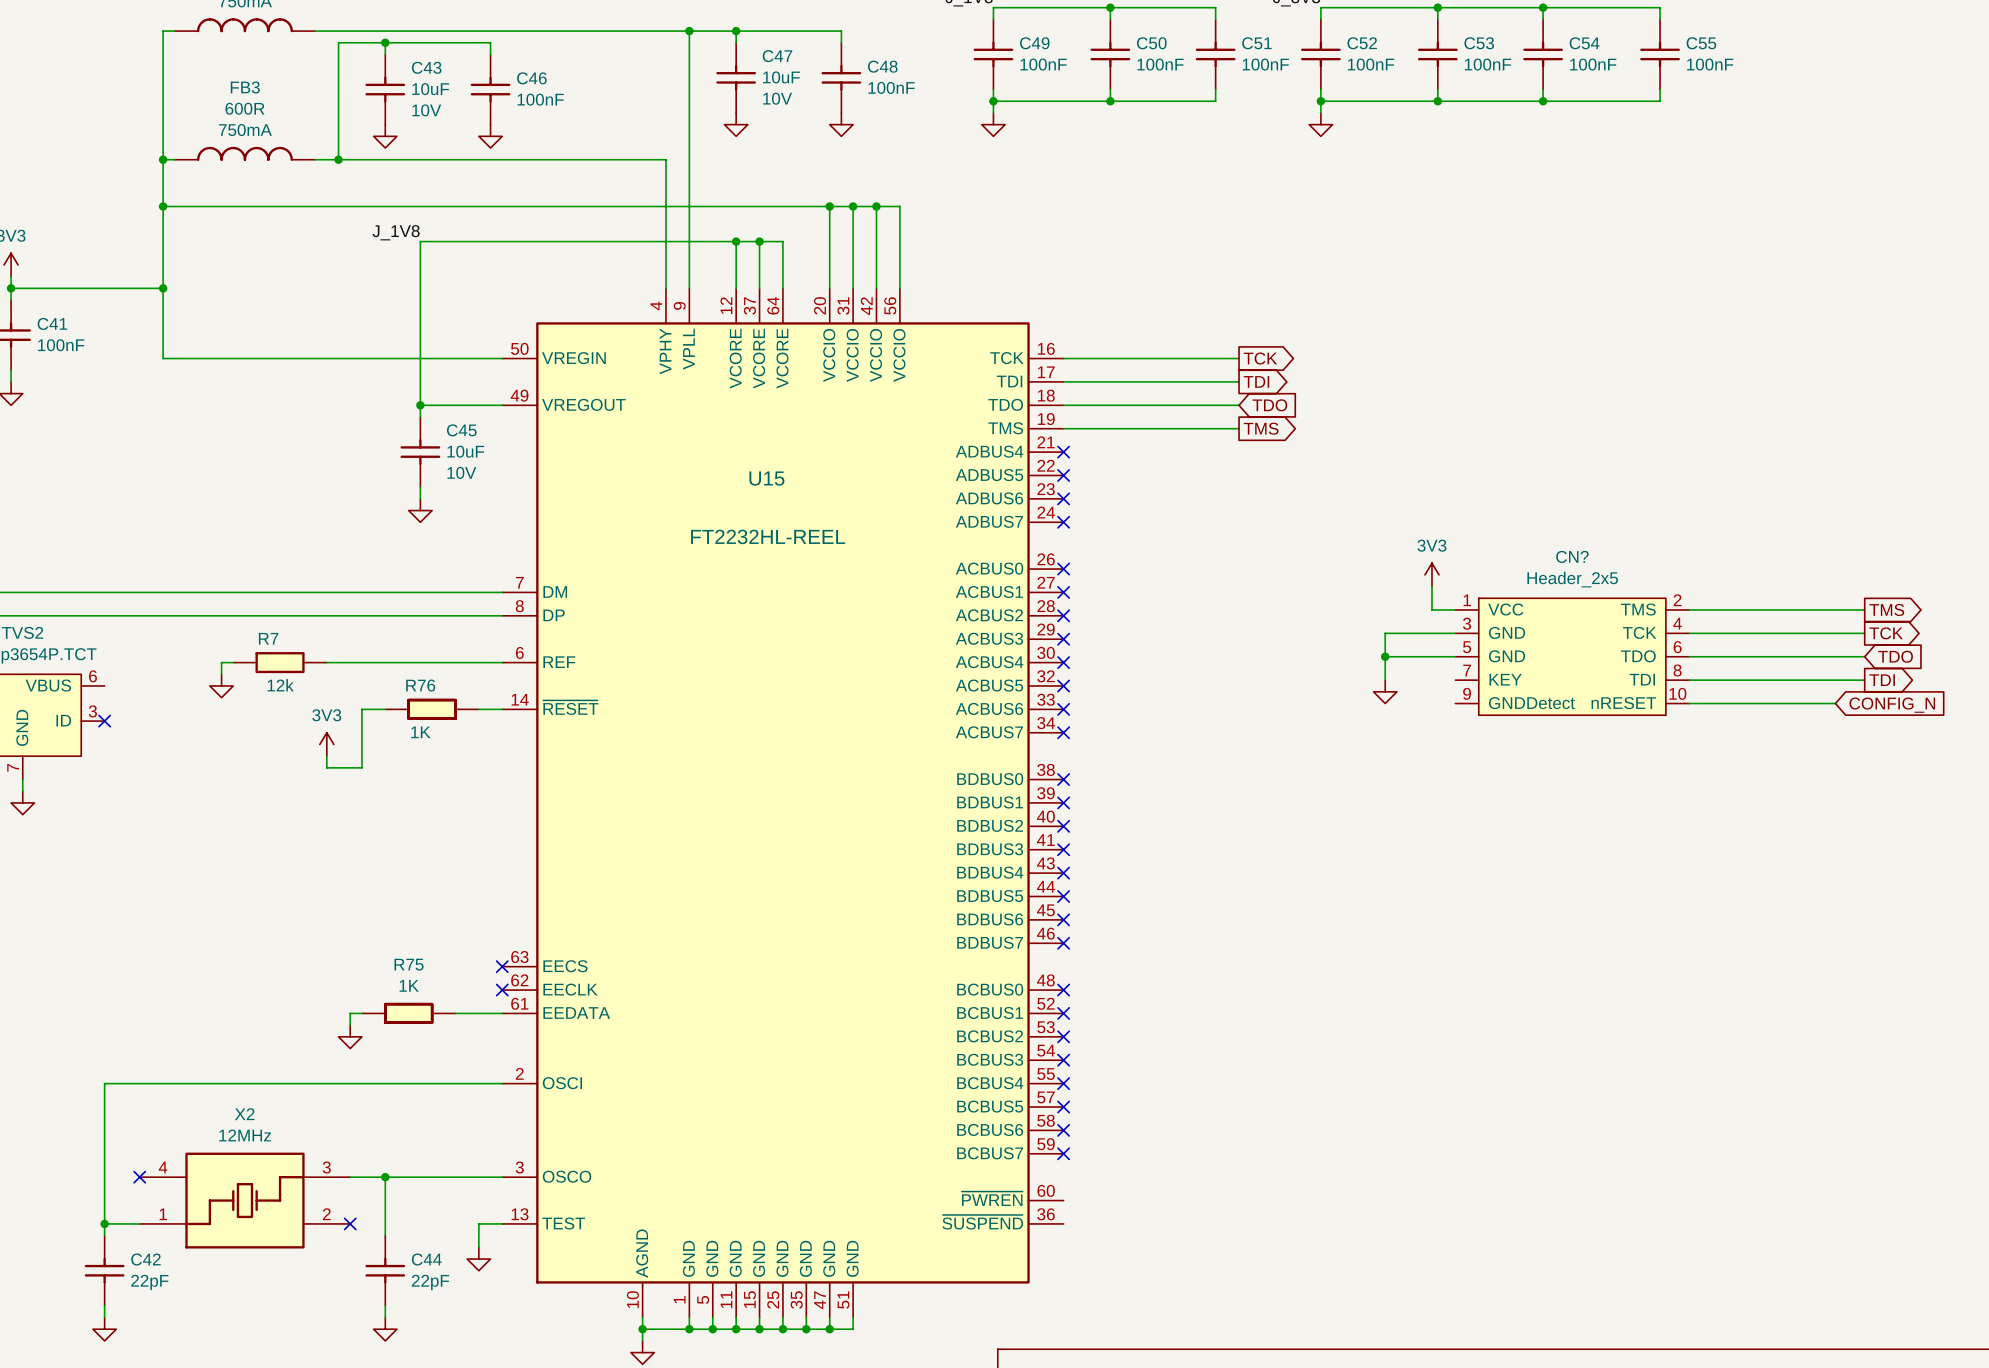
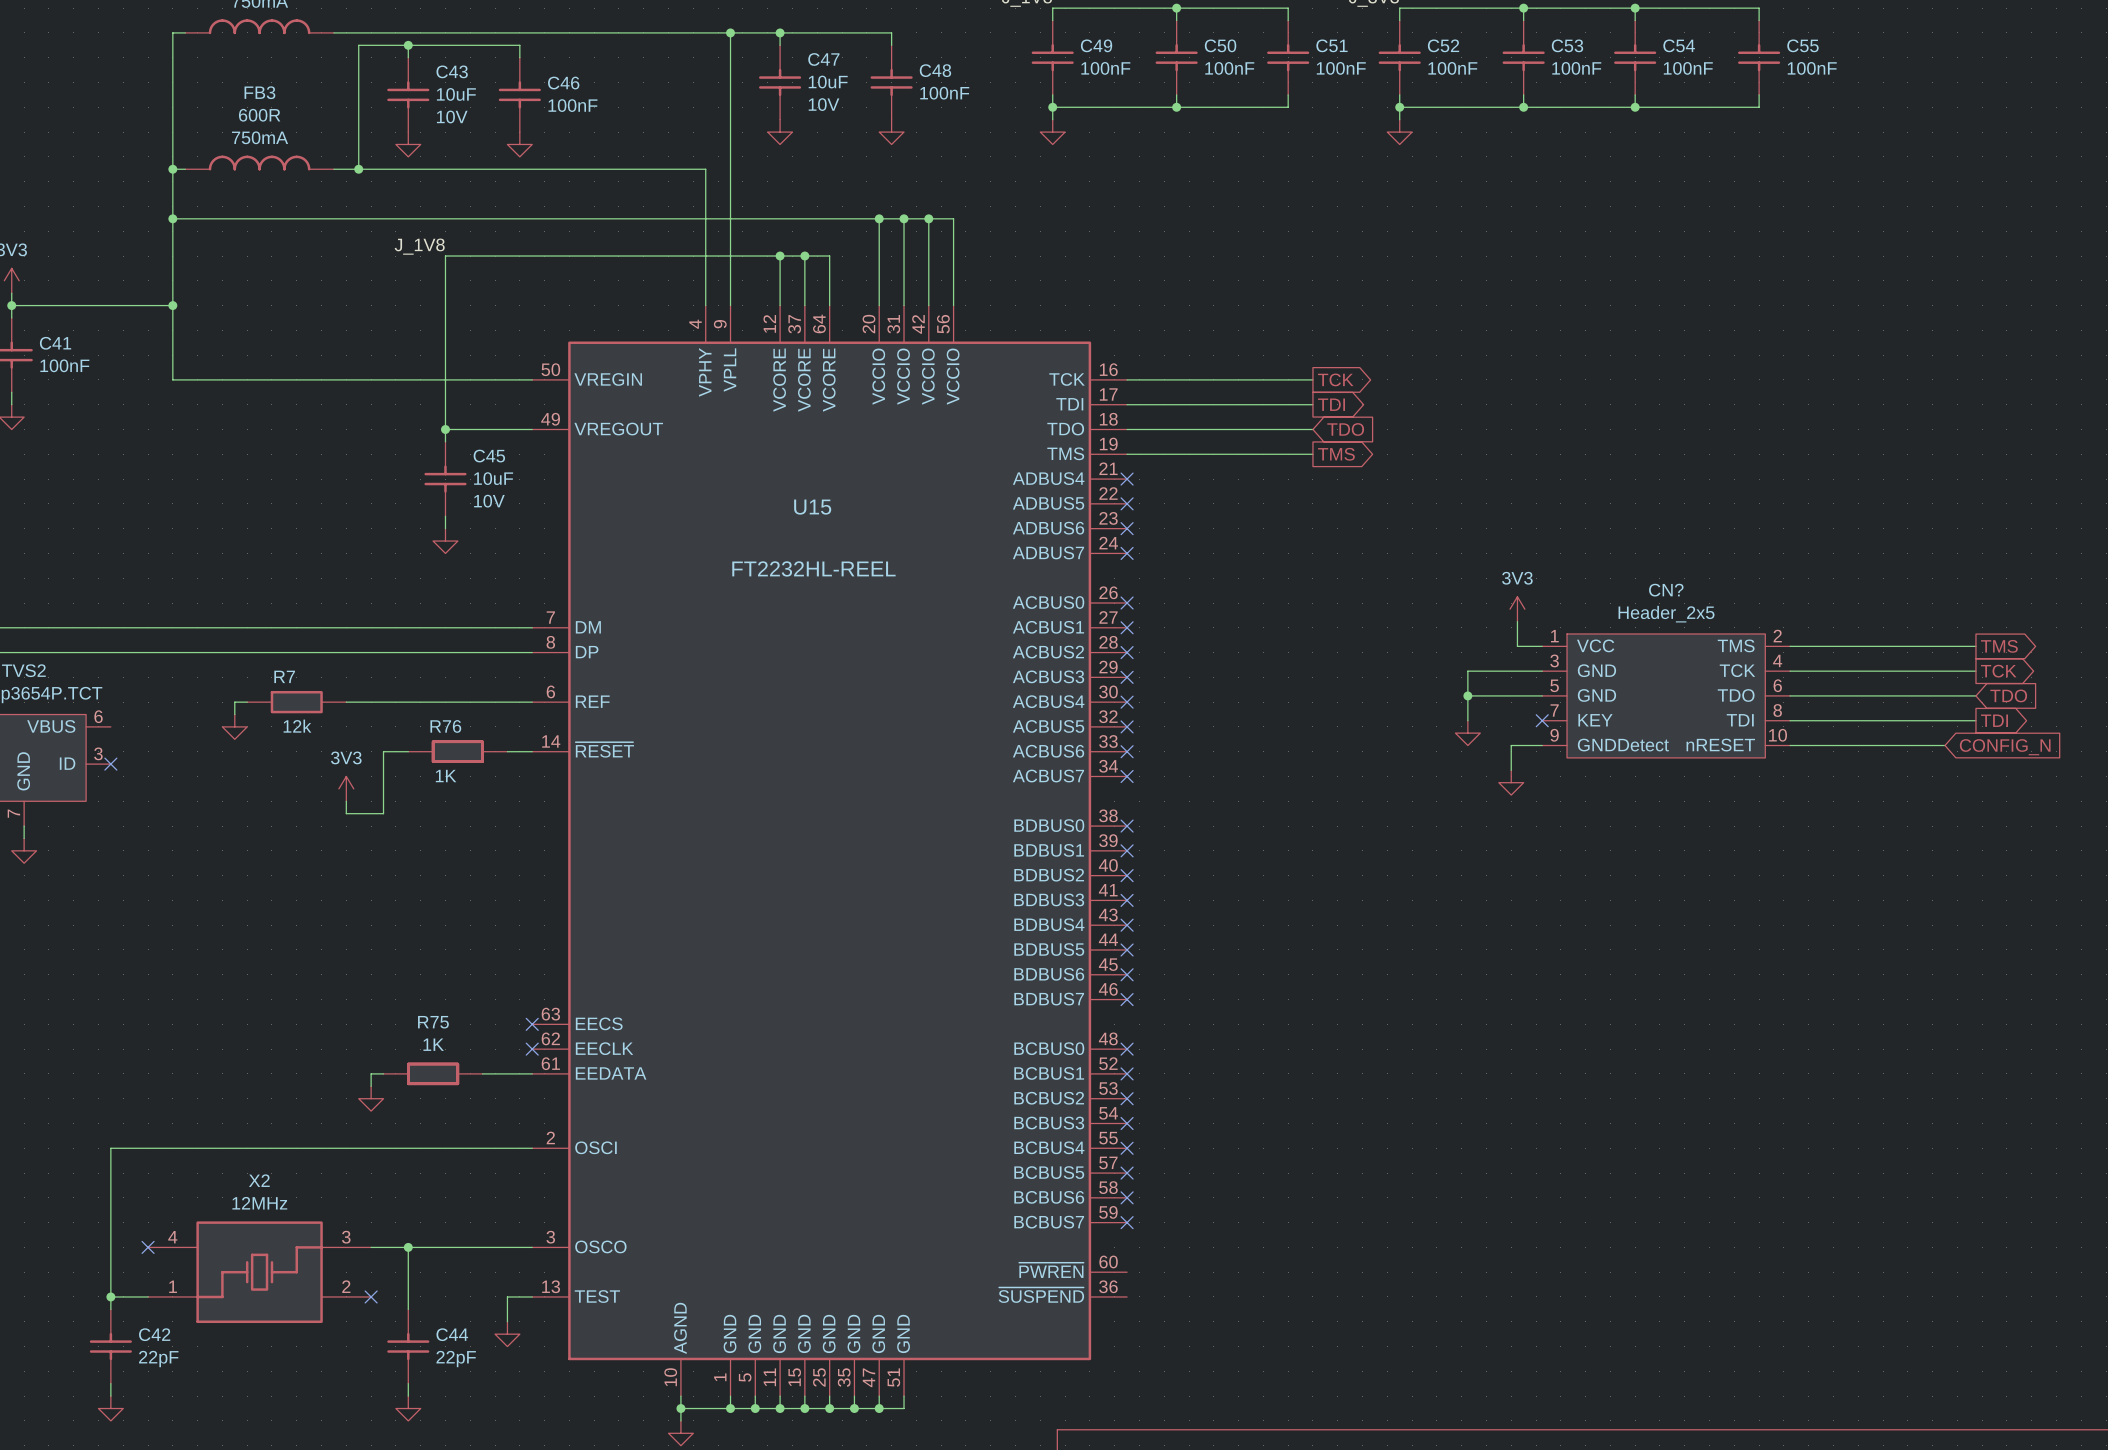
no-connect mark: none -> (1542, 720)
wire: none -> (1542, 745) (1511, 745) (1511, 770)
power symbol: none -> (1511, 782)

